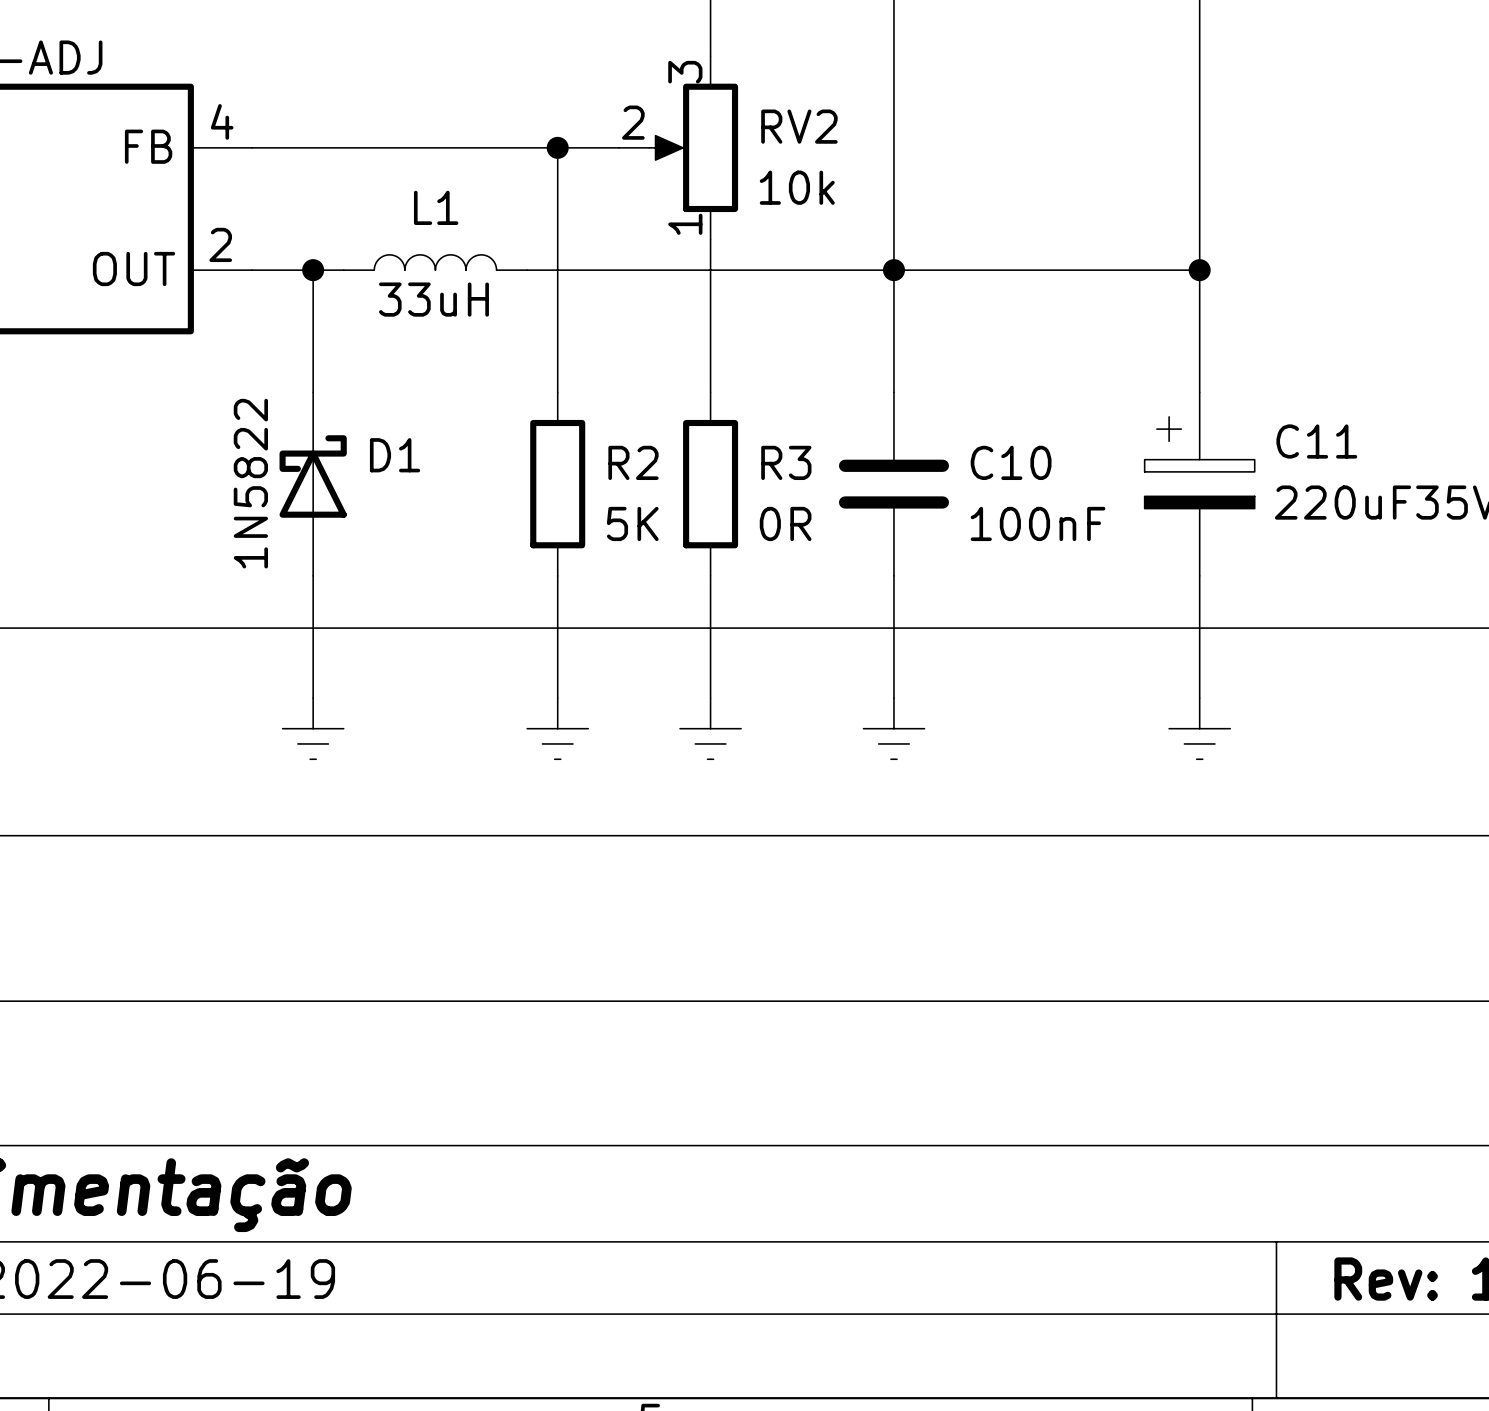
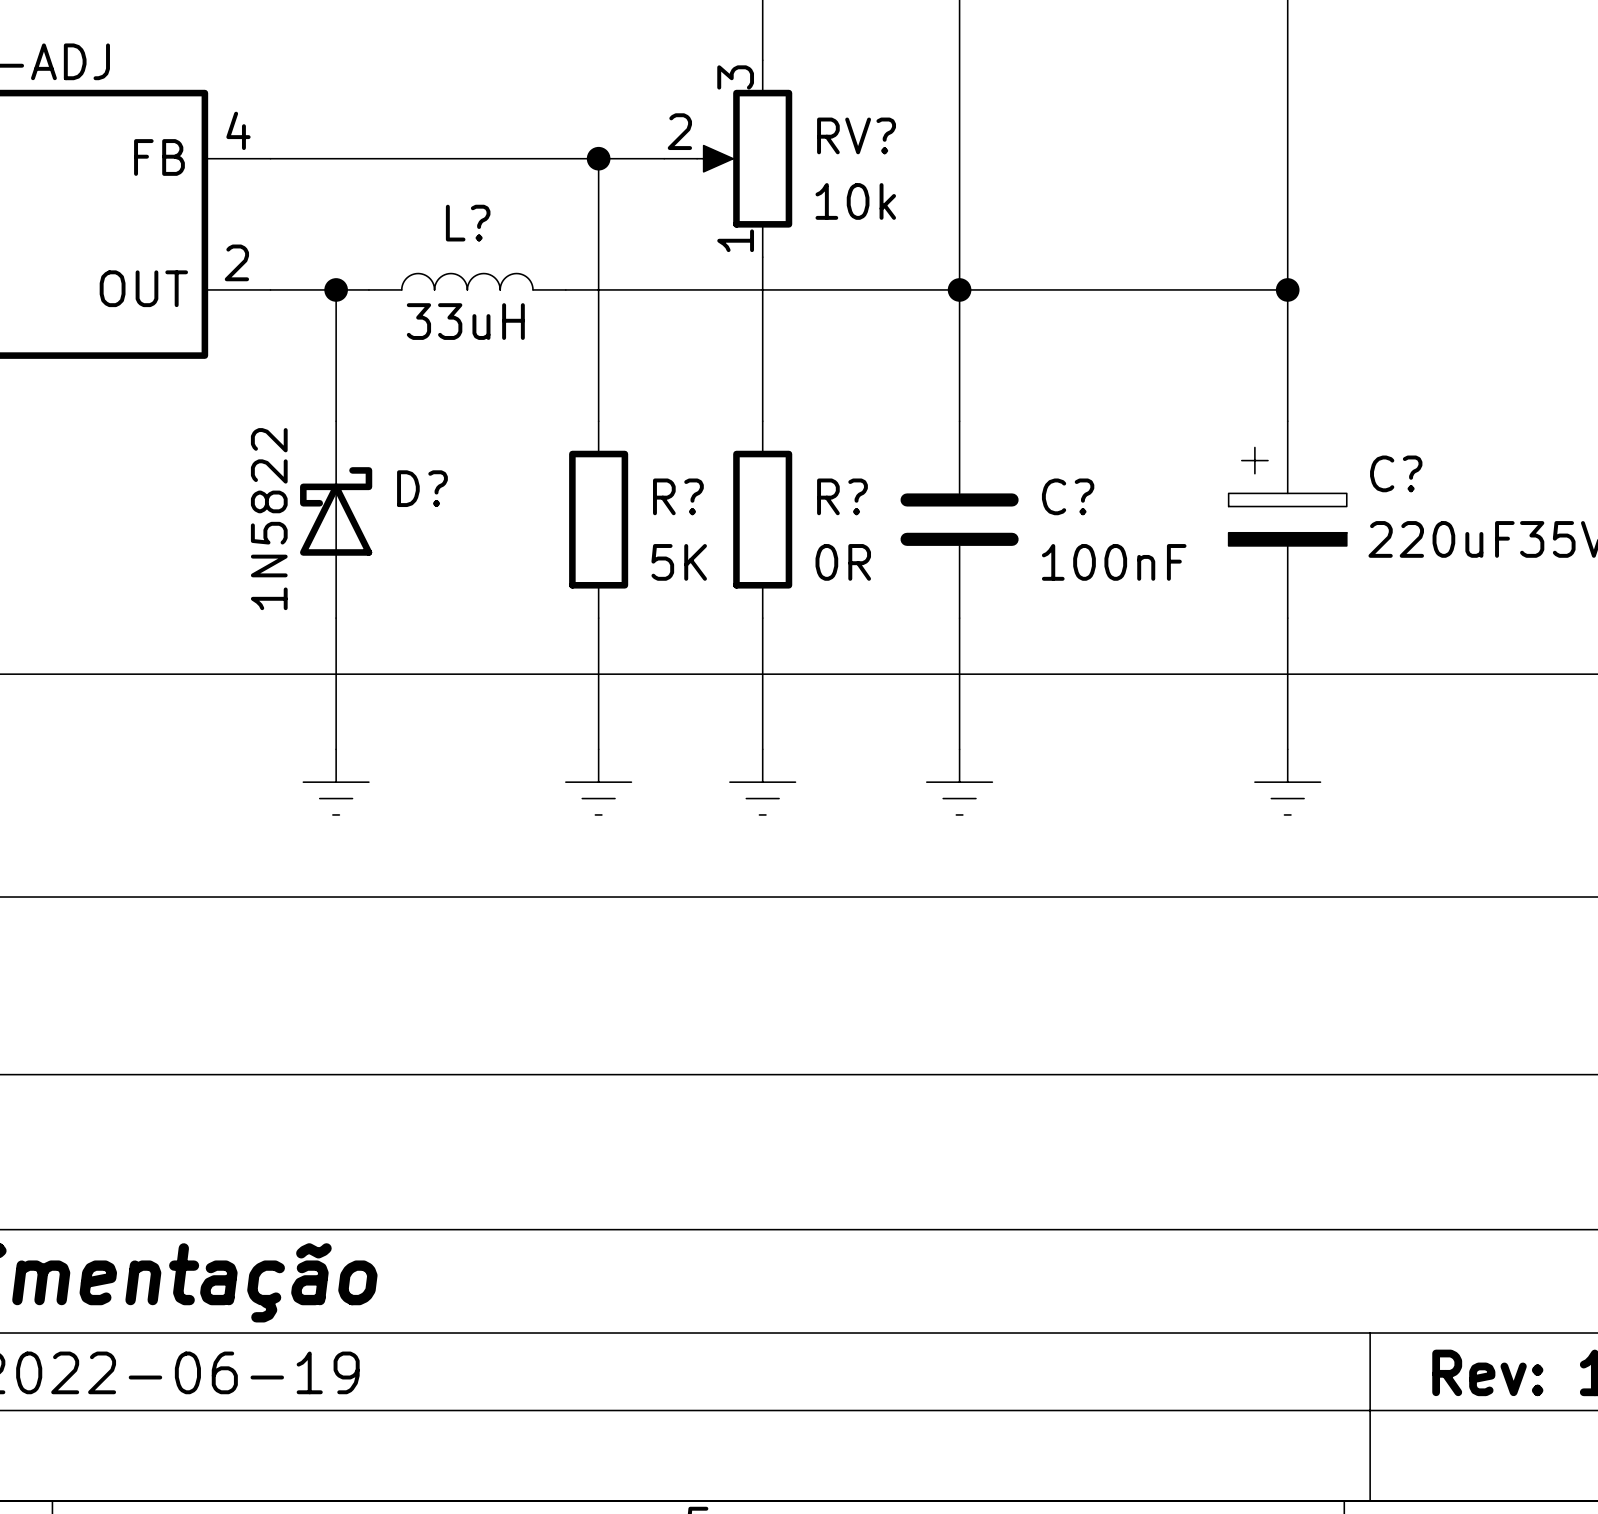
RV2 name: RV2 (799, 126) -> RV? (856, 135)
L1 name: L1 (436, 207) -> L? (468, 223)
C11 name: C11 (1316, 441) -> C? (1396, 473)
D1 name: D1 (395, 455) -> D? (422, 488)
R2 name: R2 (633, 462) -> R? (678, 496)
R3 name: R3 (786, 462) -> R? (842, 496)
C10 name: C10 (1011, 462) -> C? (1068, 496)

